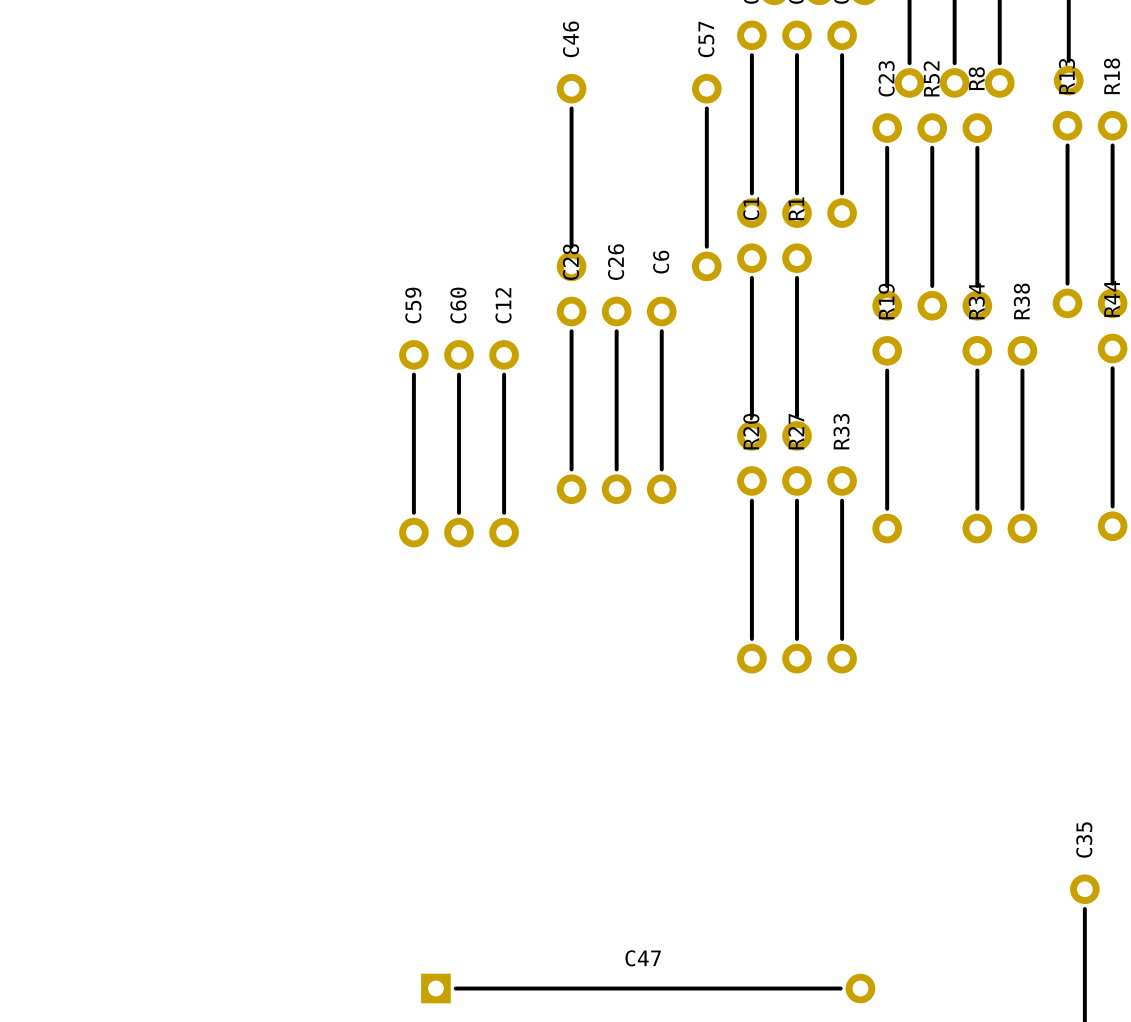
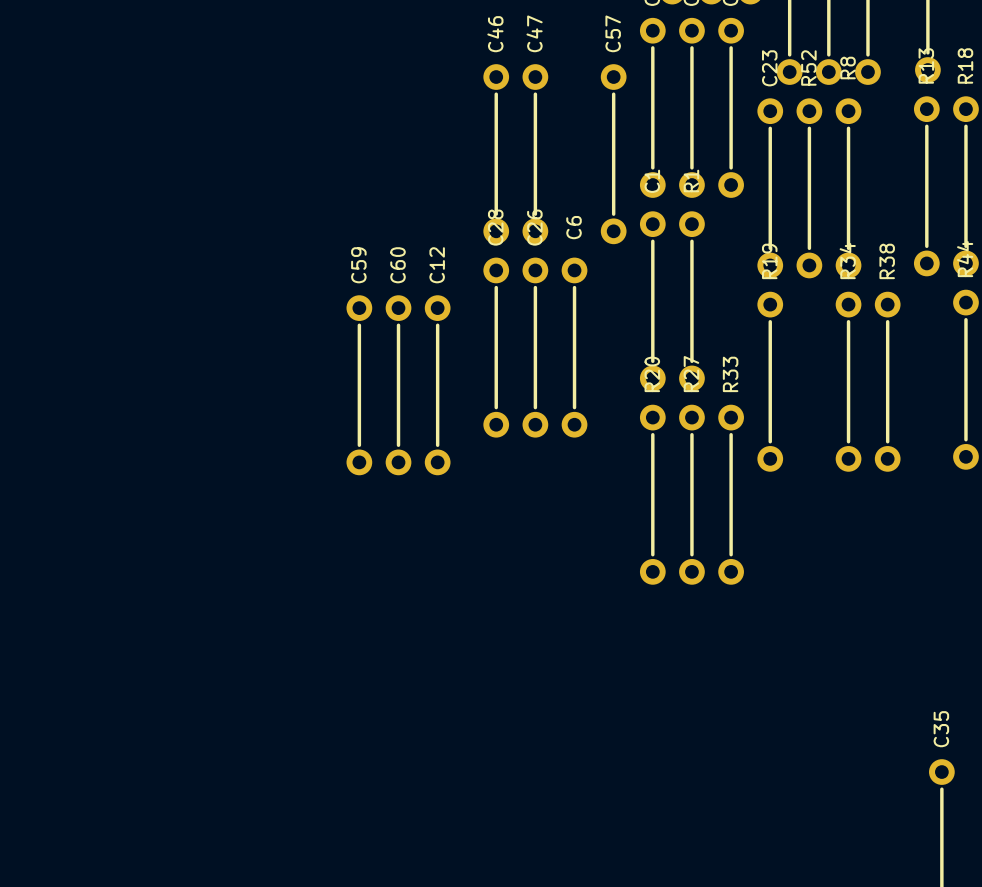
C47 name position: C47 (643, 958) -> C47 (534, 33)
C47 footprint: [421, 973, 876, 1004] -> [522, 64, 549, 245]

